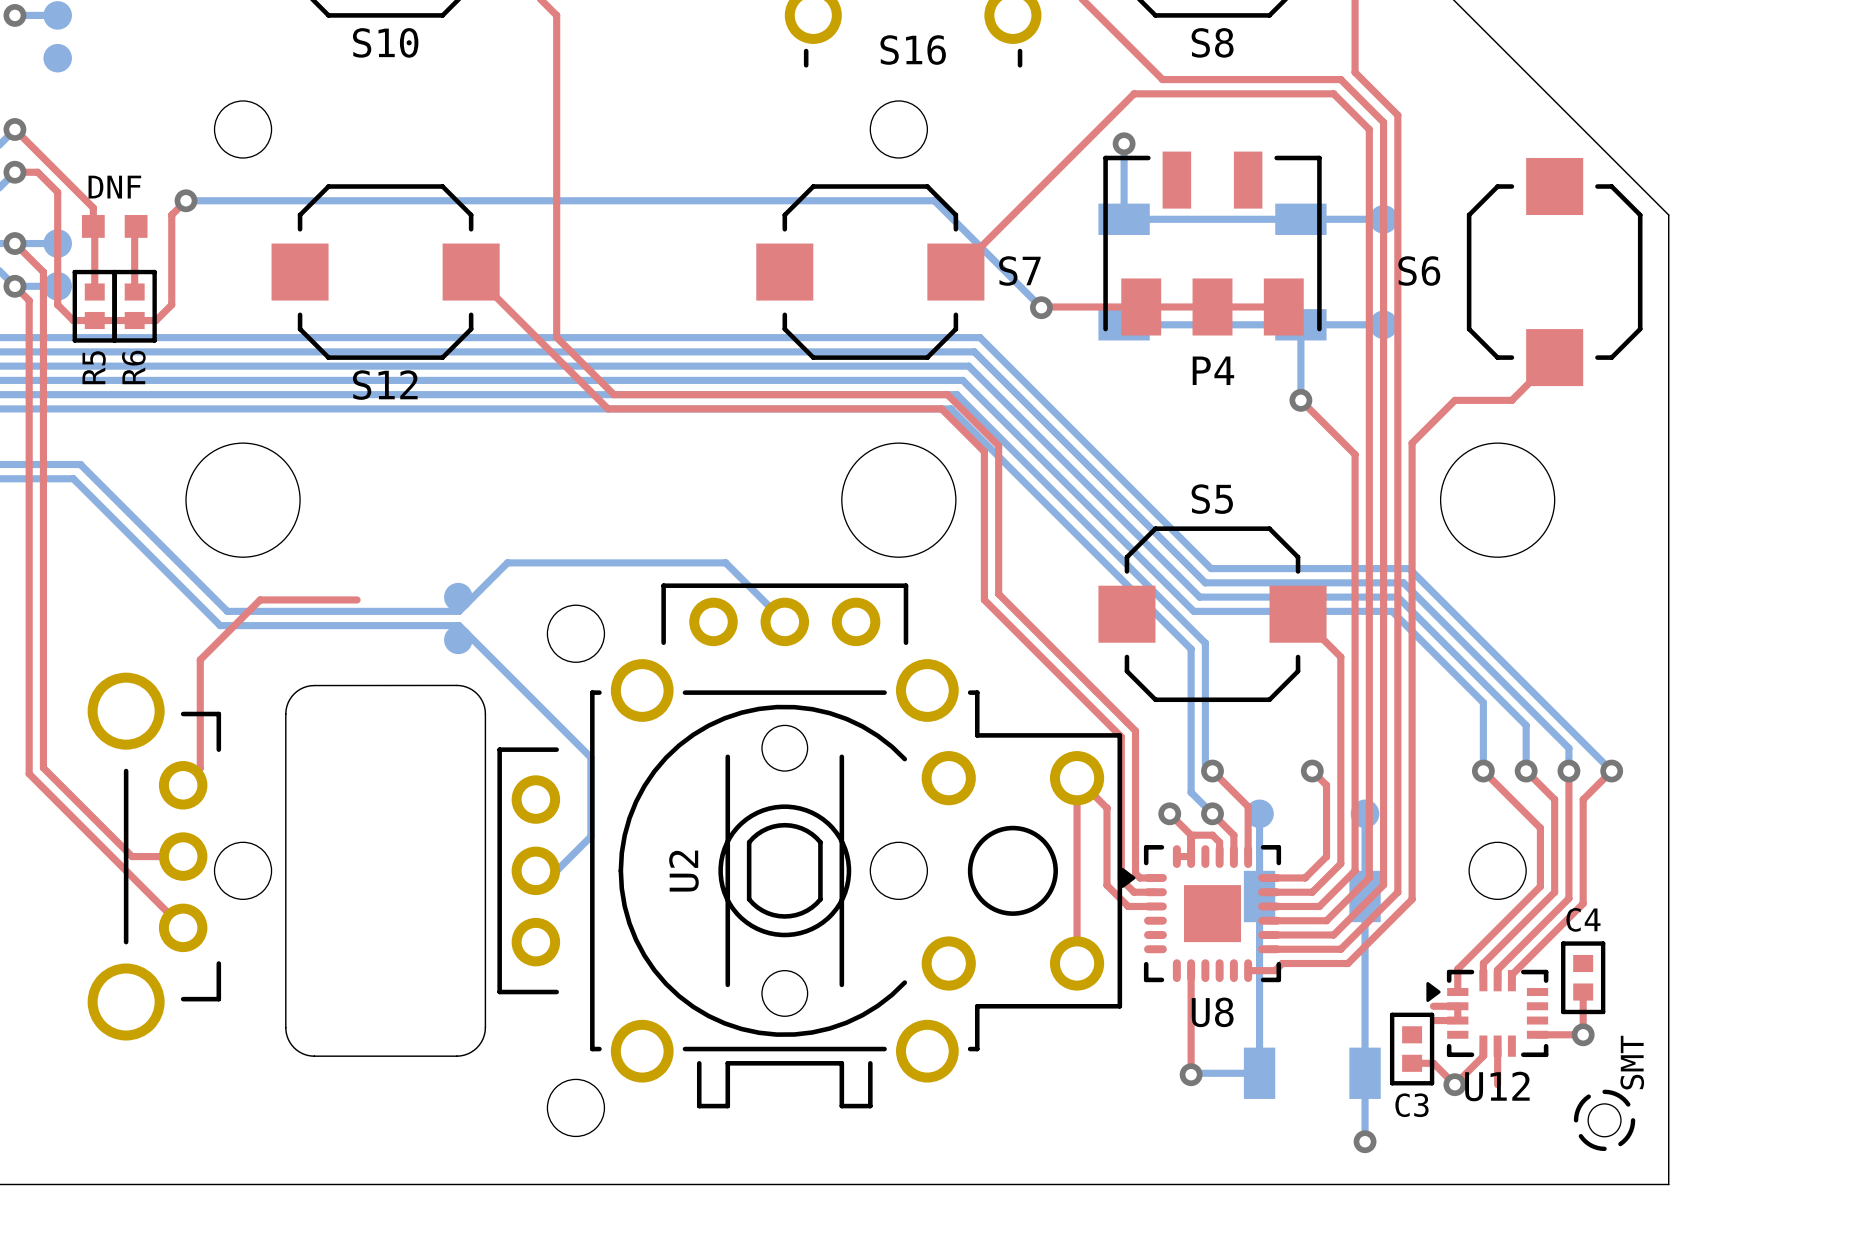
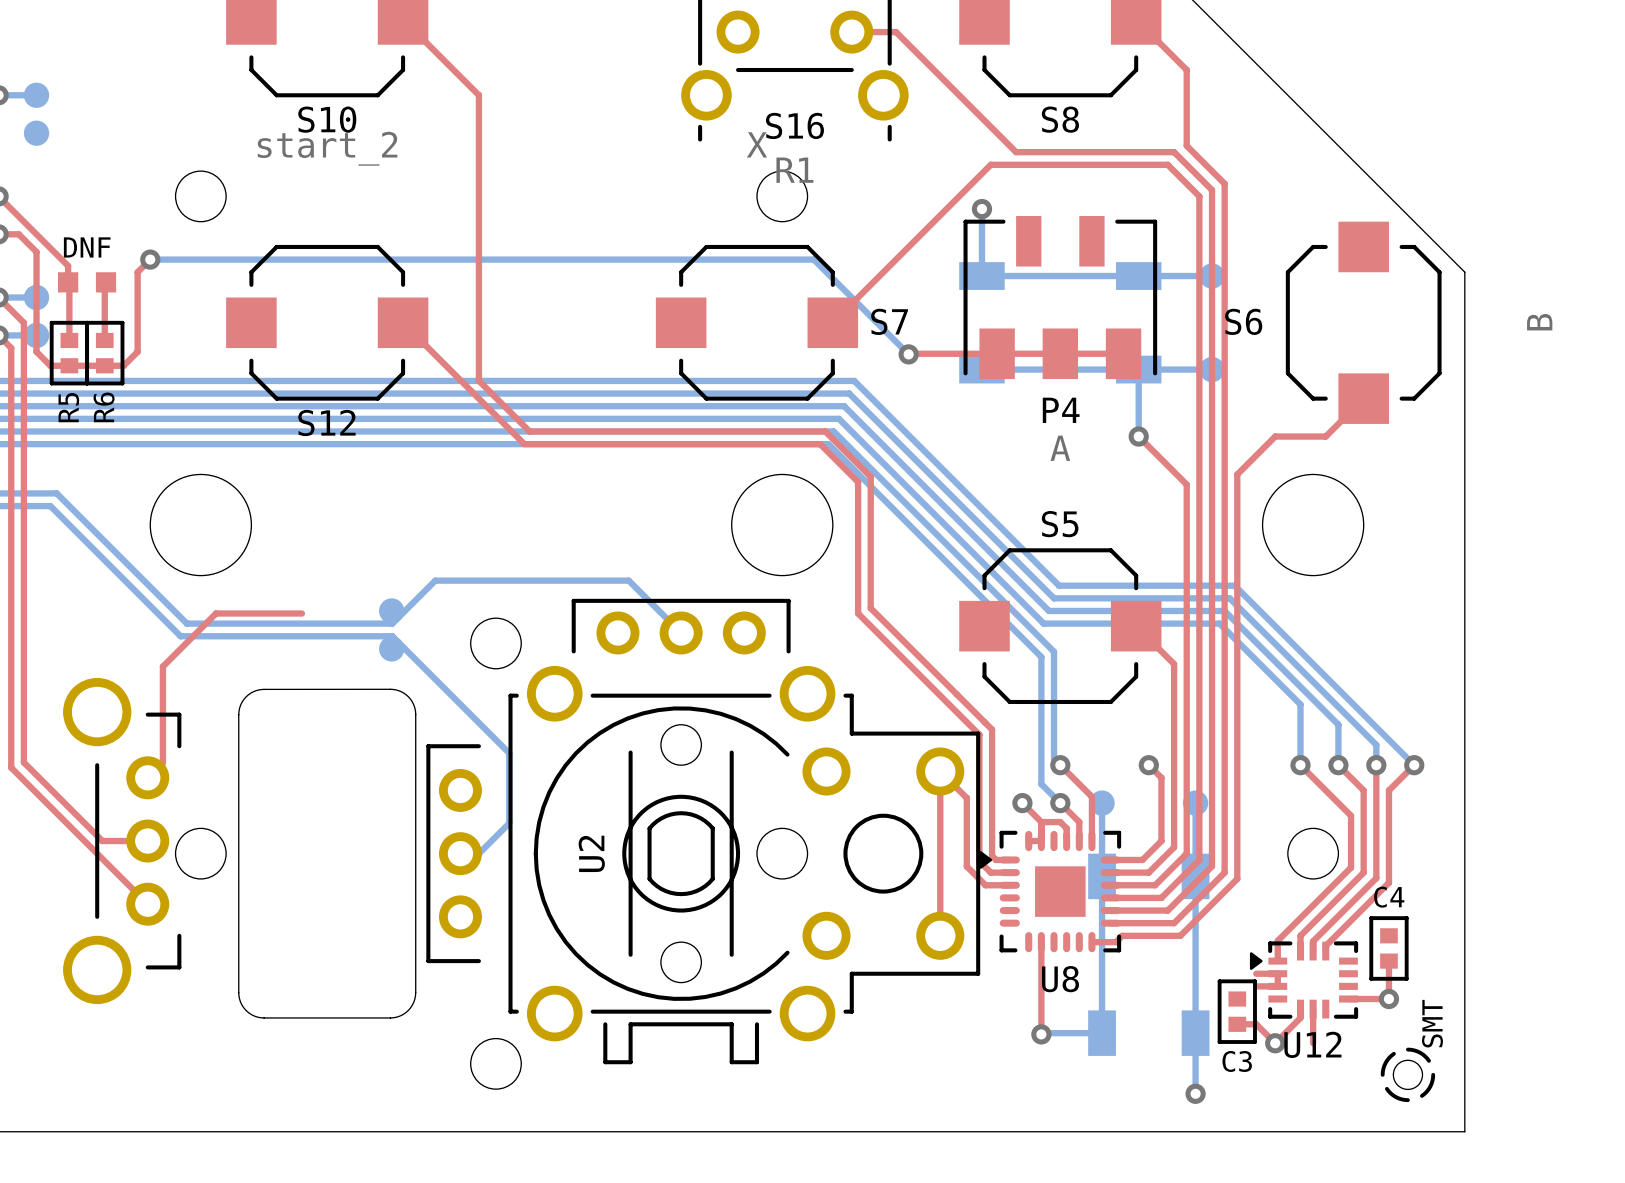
S7 value: none -> X (756, 144)
S12 value: none -> start_2 (327, 148)
S16 value: none -> R1 (794, 170)
S6 value: none -> B (1539, 322)
S5 value: none -> A (1060, 448)

